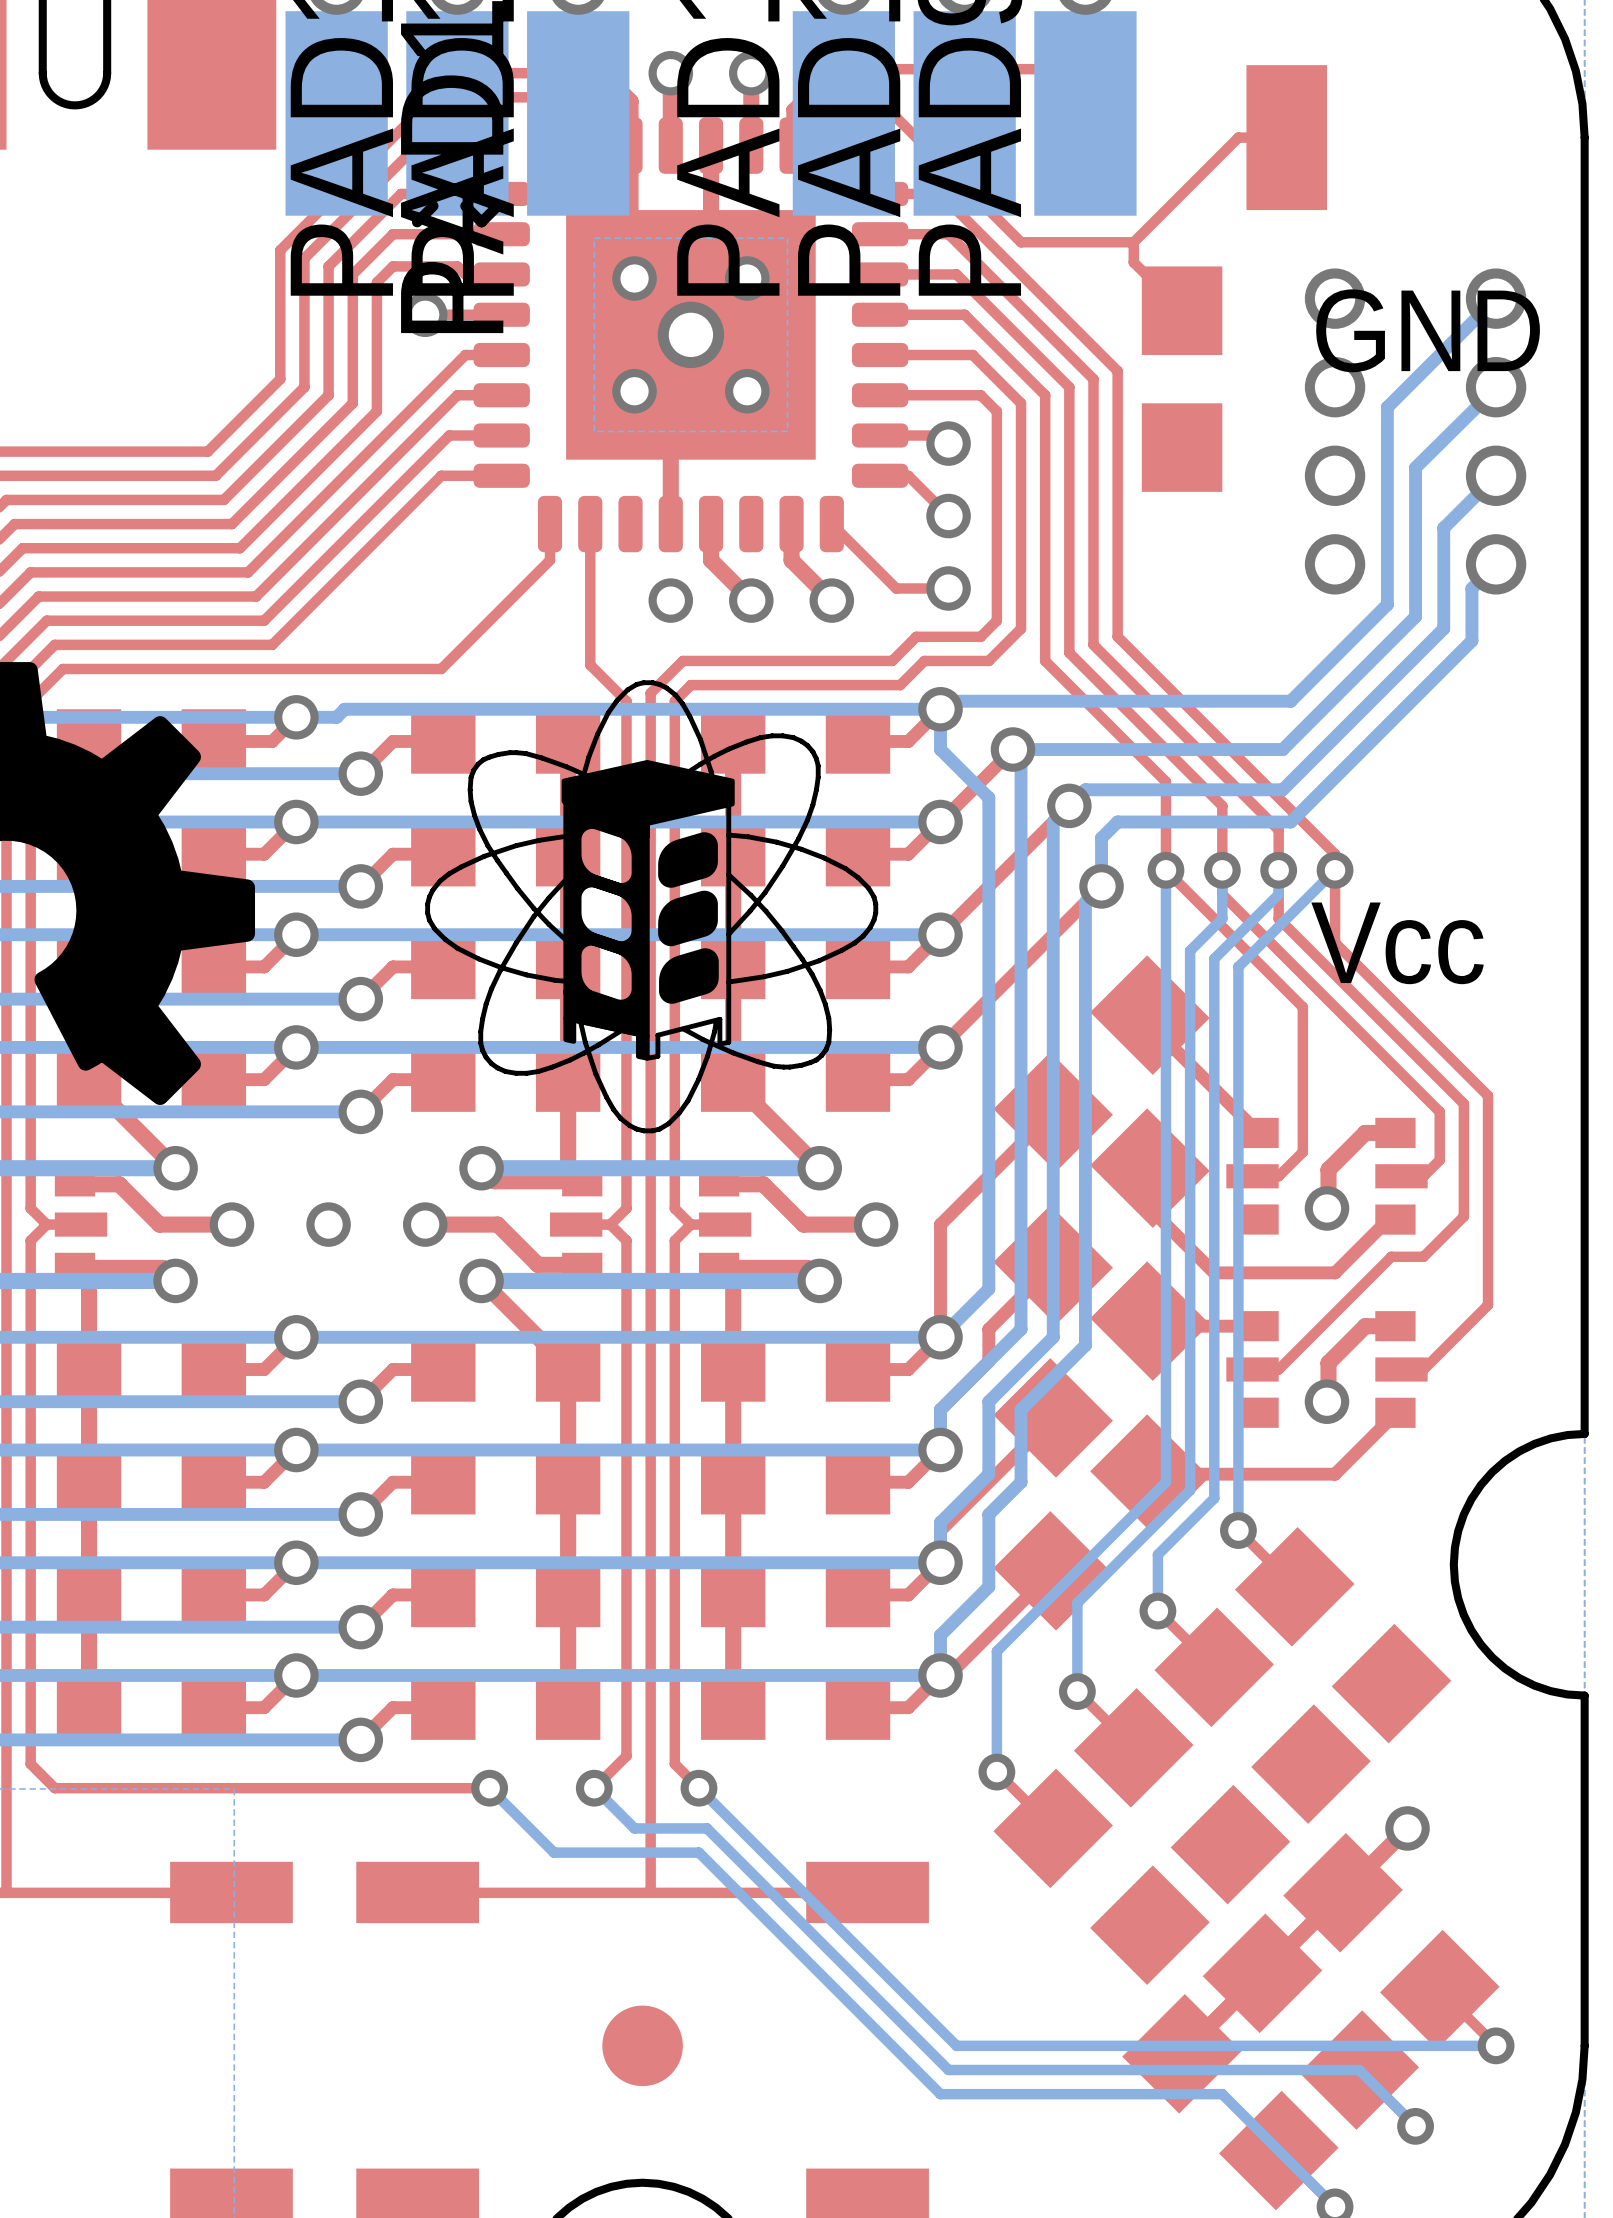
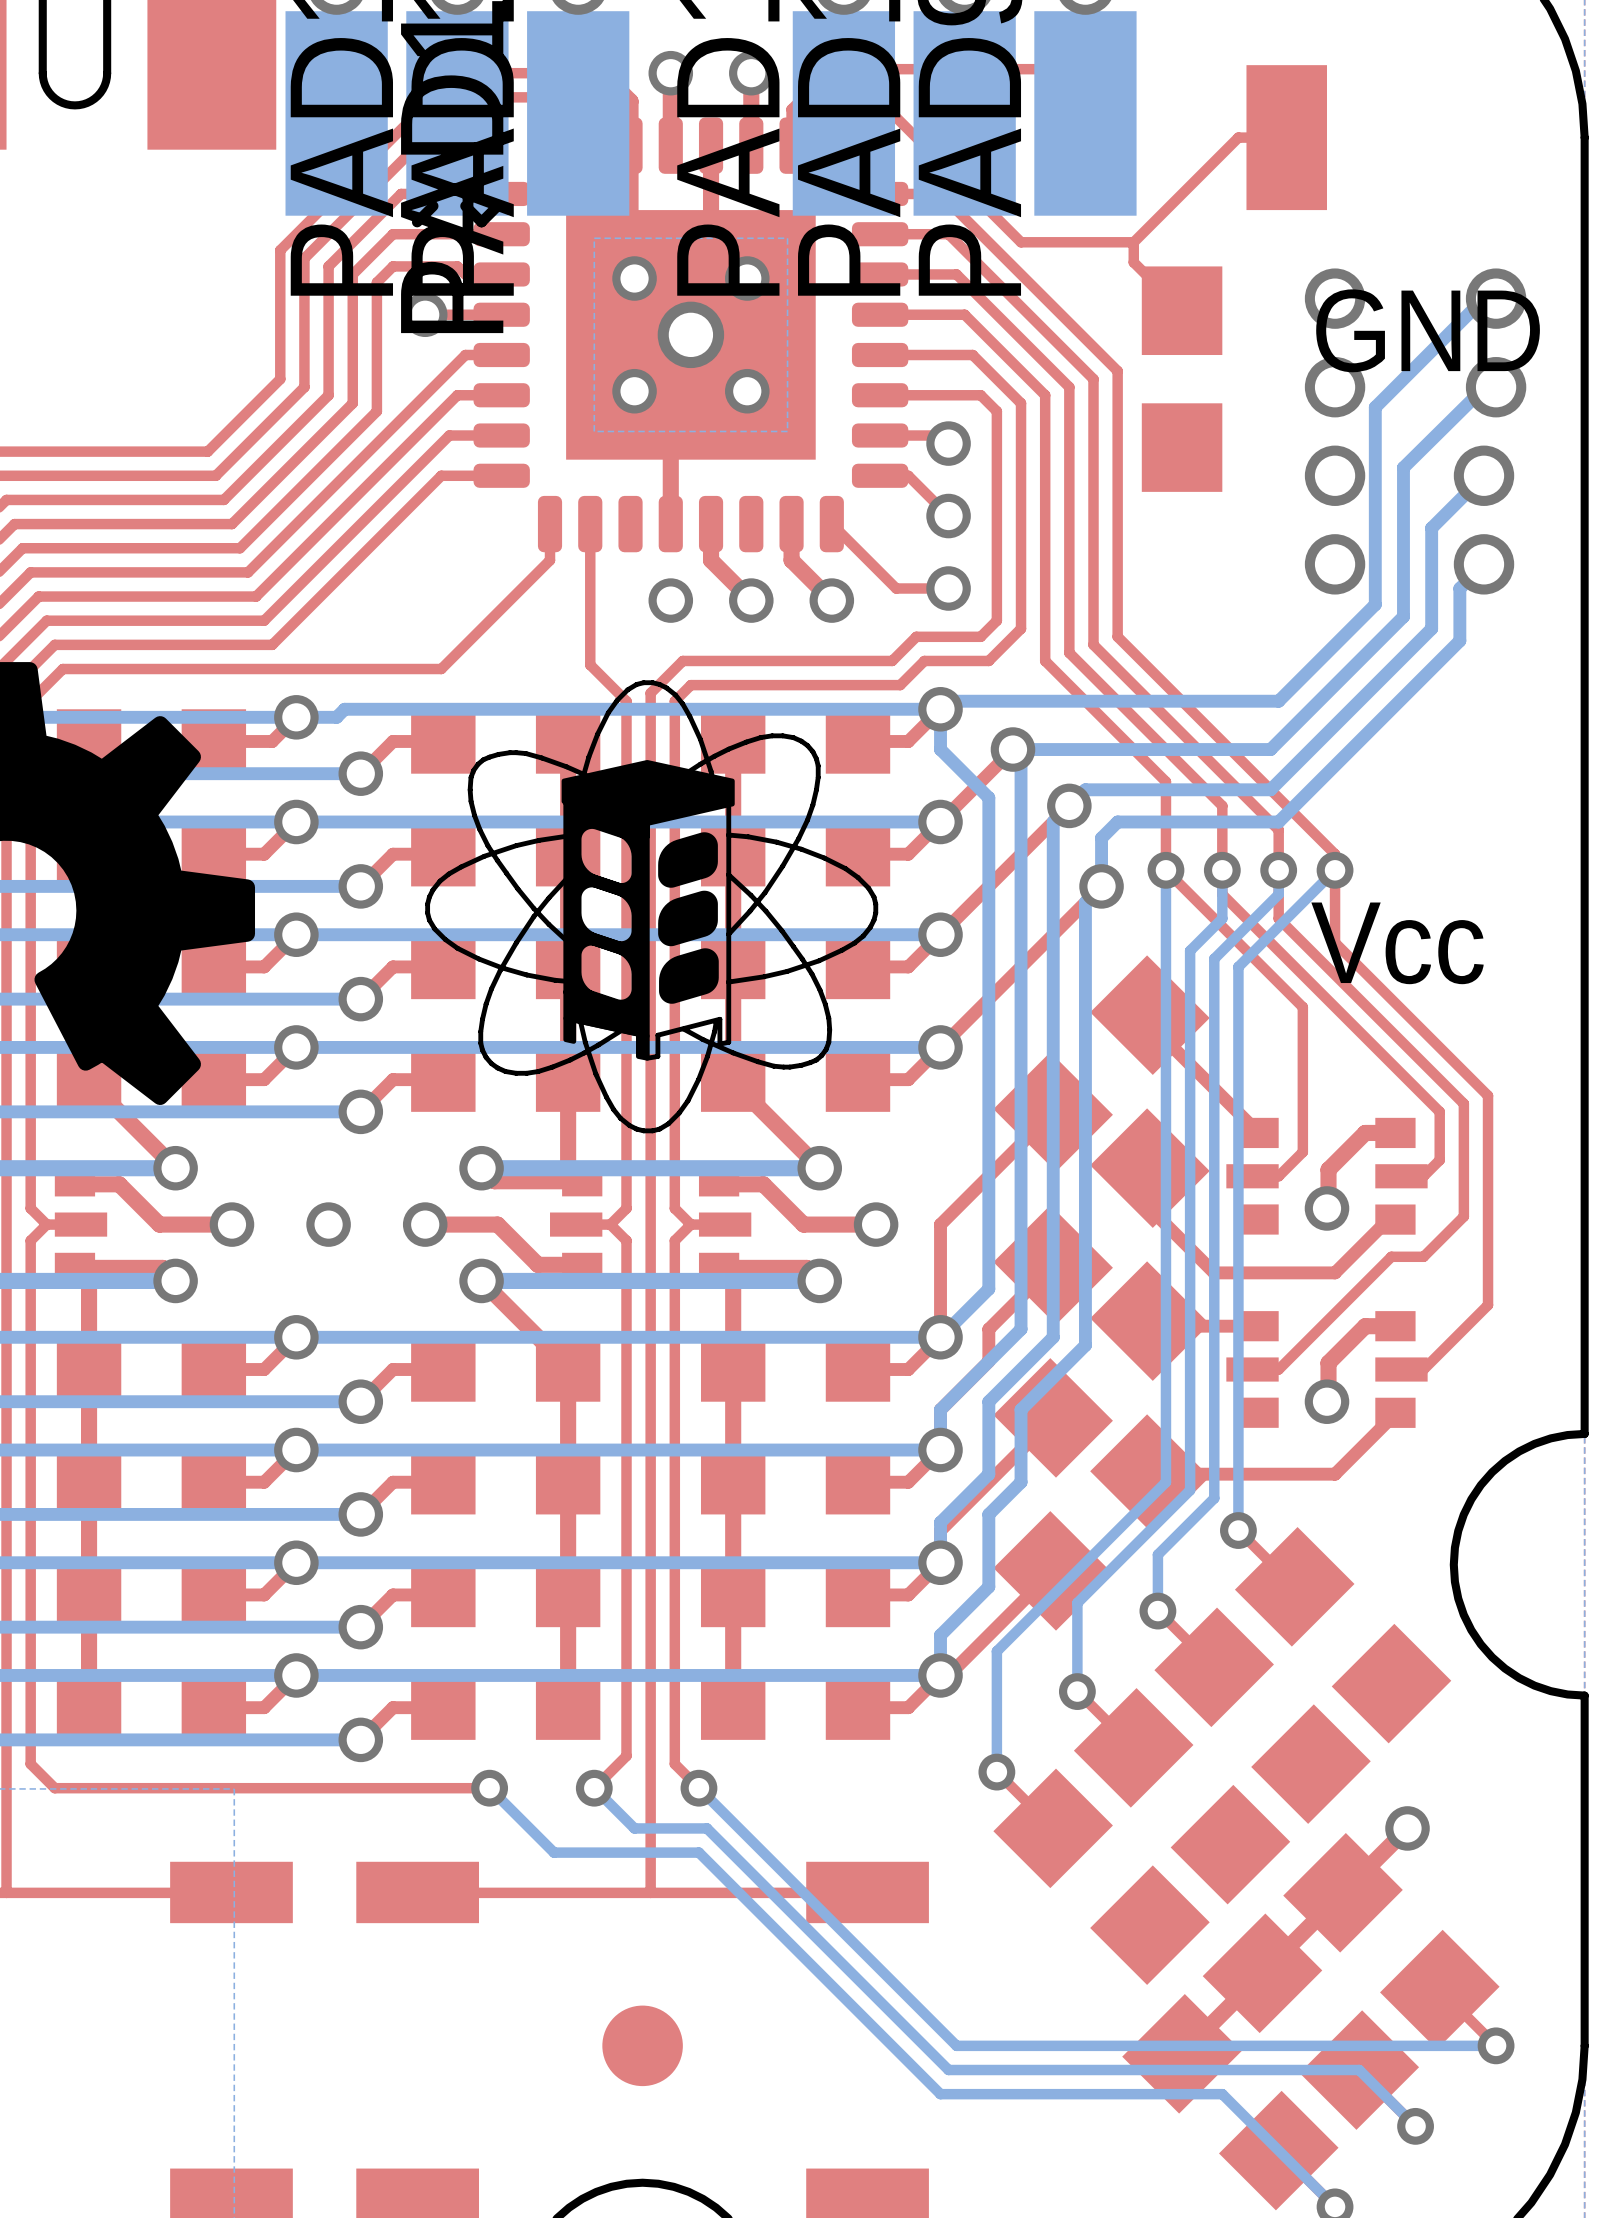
bottom track: (1496, 298) (1387, 407) (1387, 604) (1290, 701) (1278, 701) -> (1484, 298) (1375, 407) (1375, 604) (1278, 701)
bottom track: (1496, 388) (1415, 467) (1415, 616) (1282, 749) (1270, 749) -> (1484, 388) (1403, 467) (1403, 616) (1270, 749)
bottom track: (1496, 475) (1443, 528) (1443, 628) (1282, 789) (1270, 789) -> (1484, 475) (1431, 528) (1431, 628) (1270, 789)
via position: (1496, 475) -> (1484, 475)
bottom track: (1496, 564) (1471, 588) (1471, 640) (1290, 821) (1278, 821) -> (1484, 564) (1459, 588) (1459, 640) (1278, 821)
via position: (1496, 564) -> (1484, 564)

